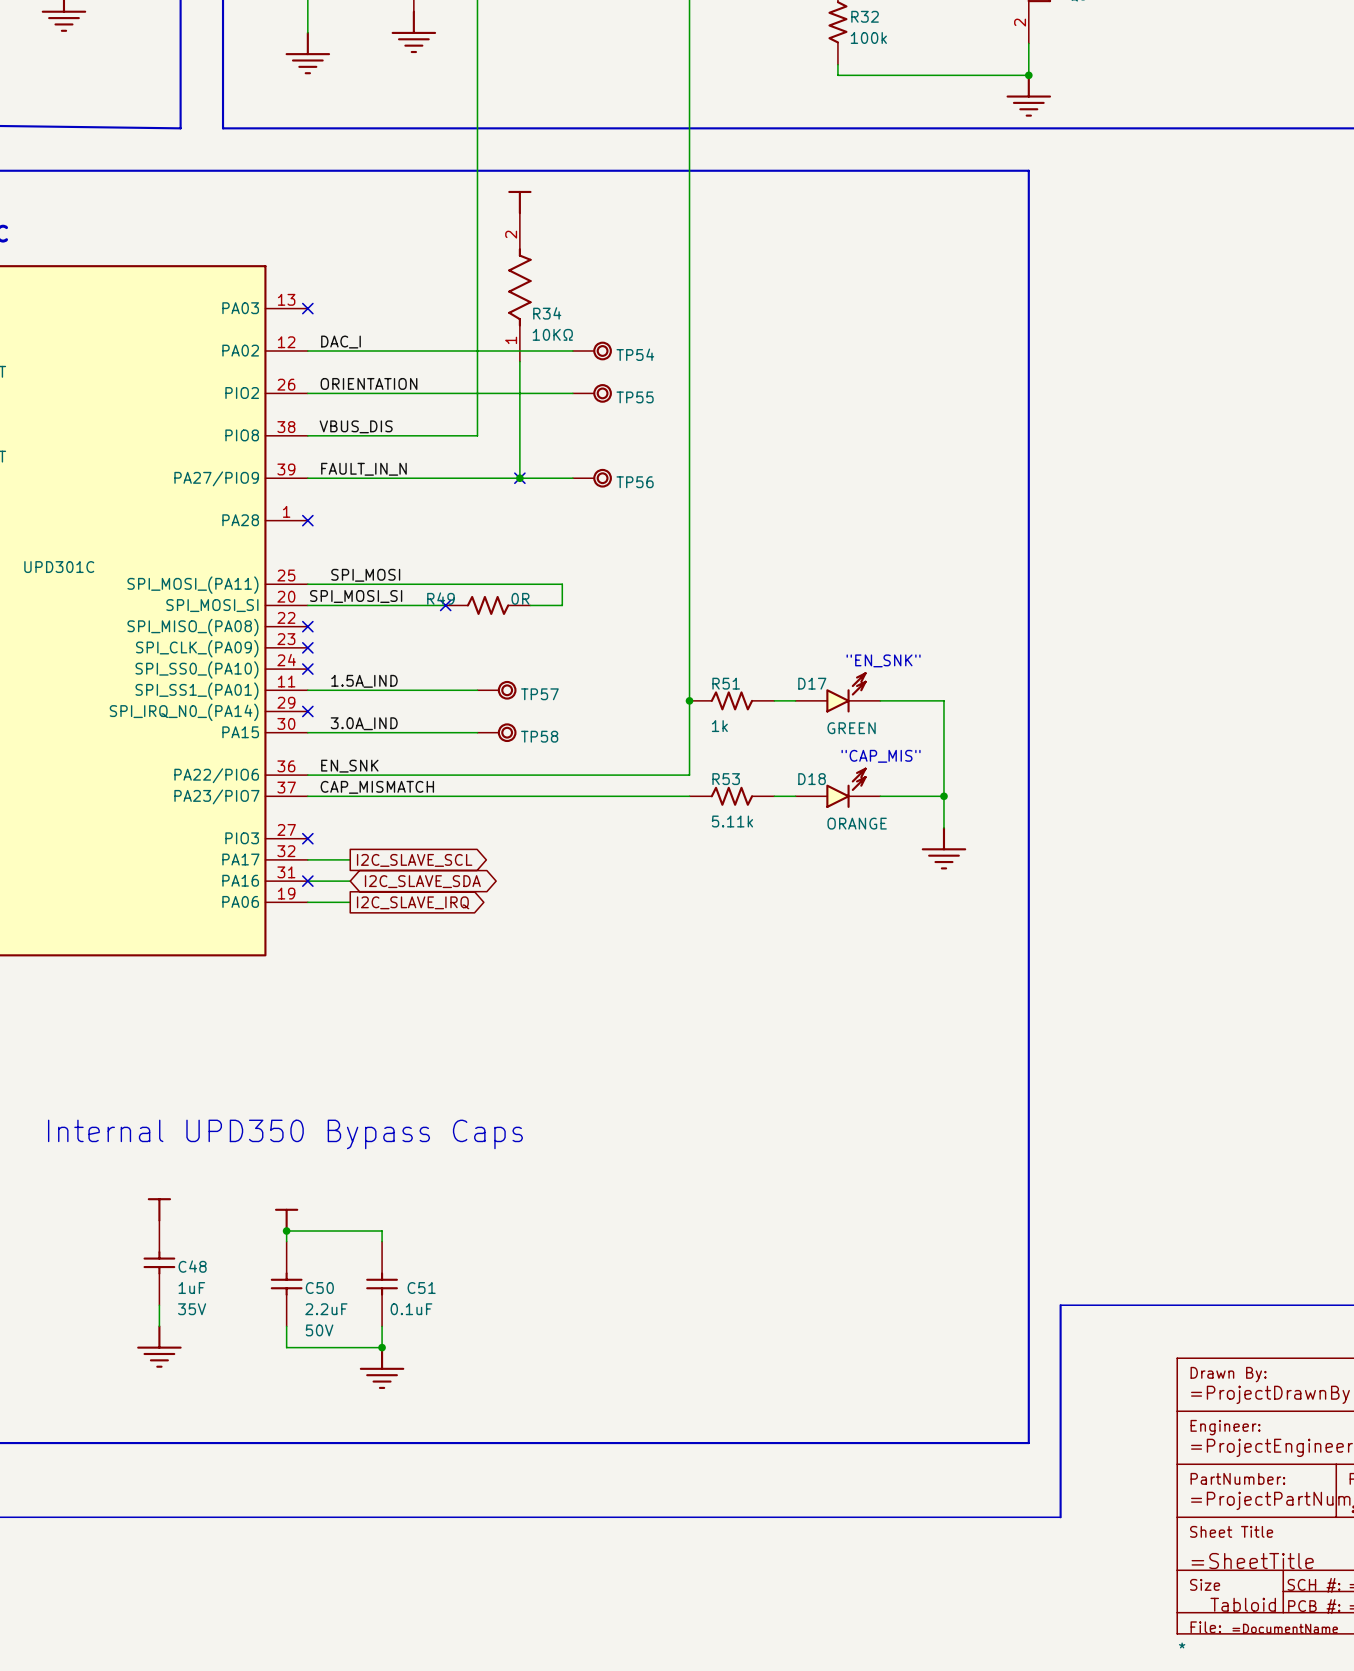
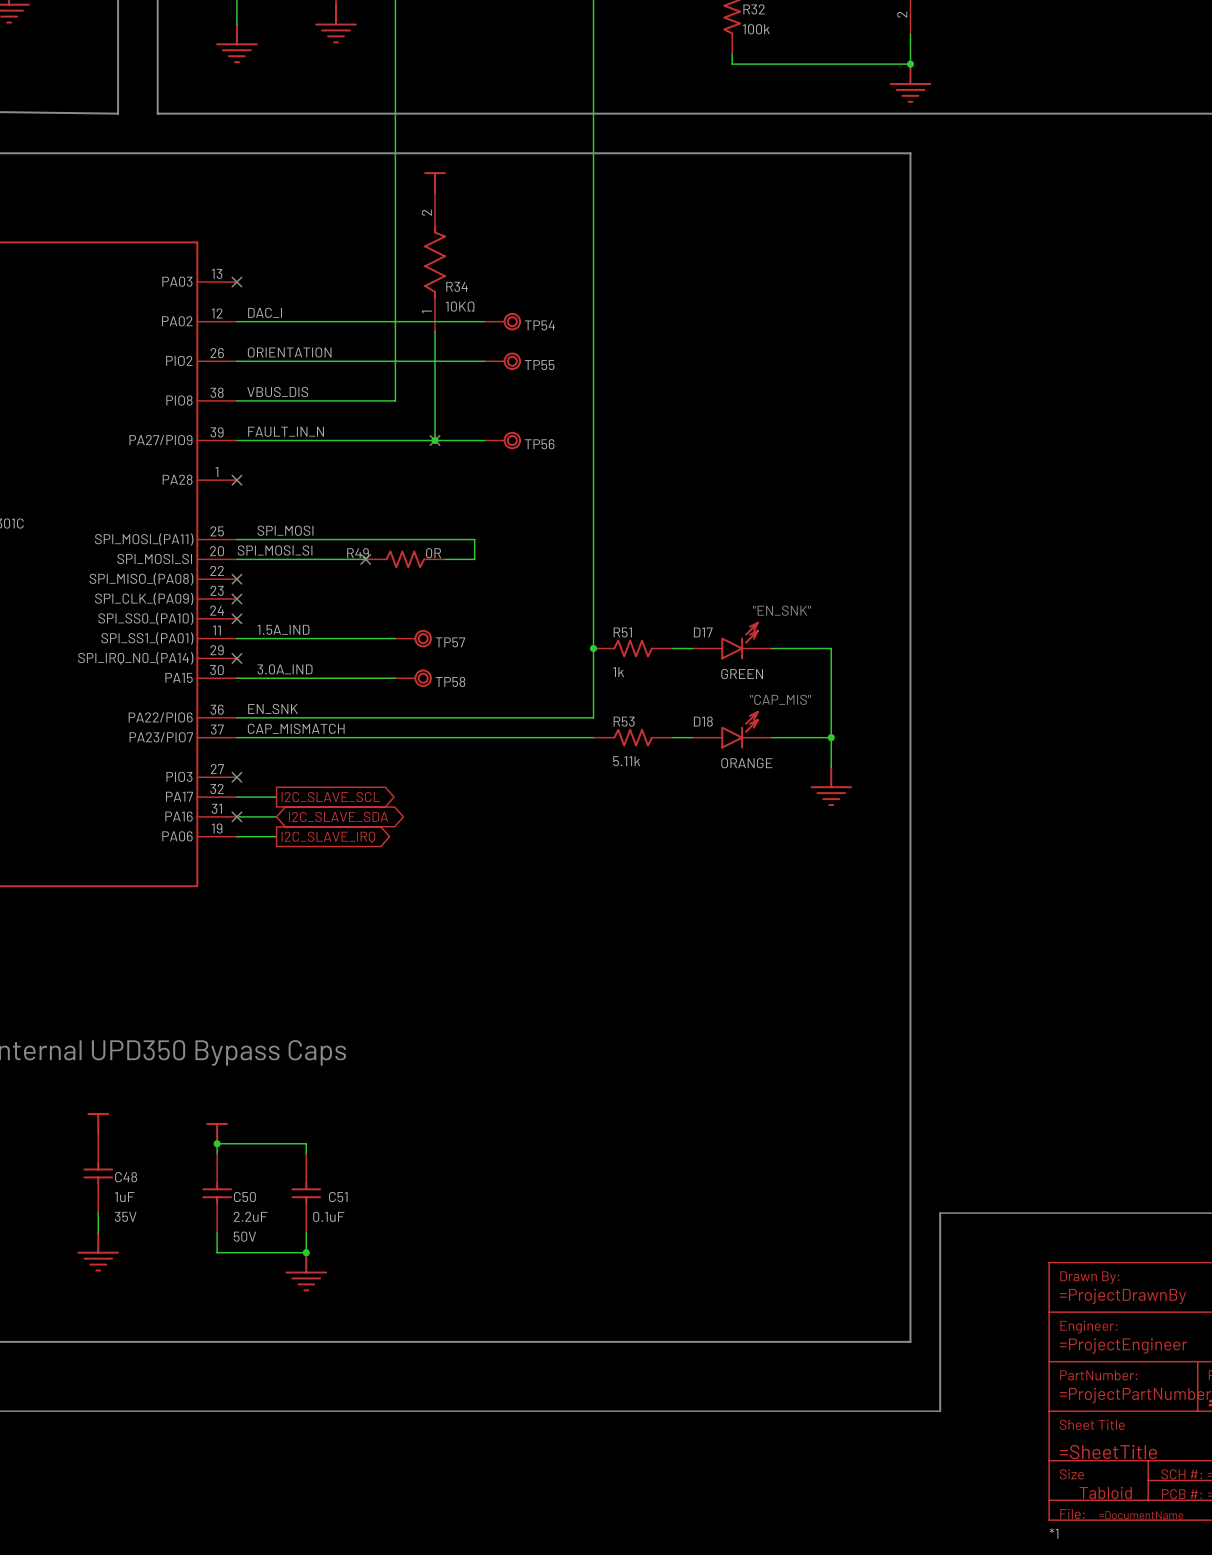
*1 name: * (1182, 1645) -> *1 (1053, 1533)

